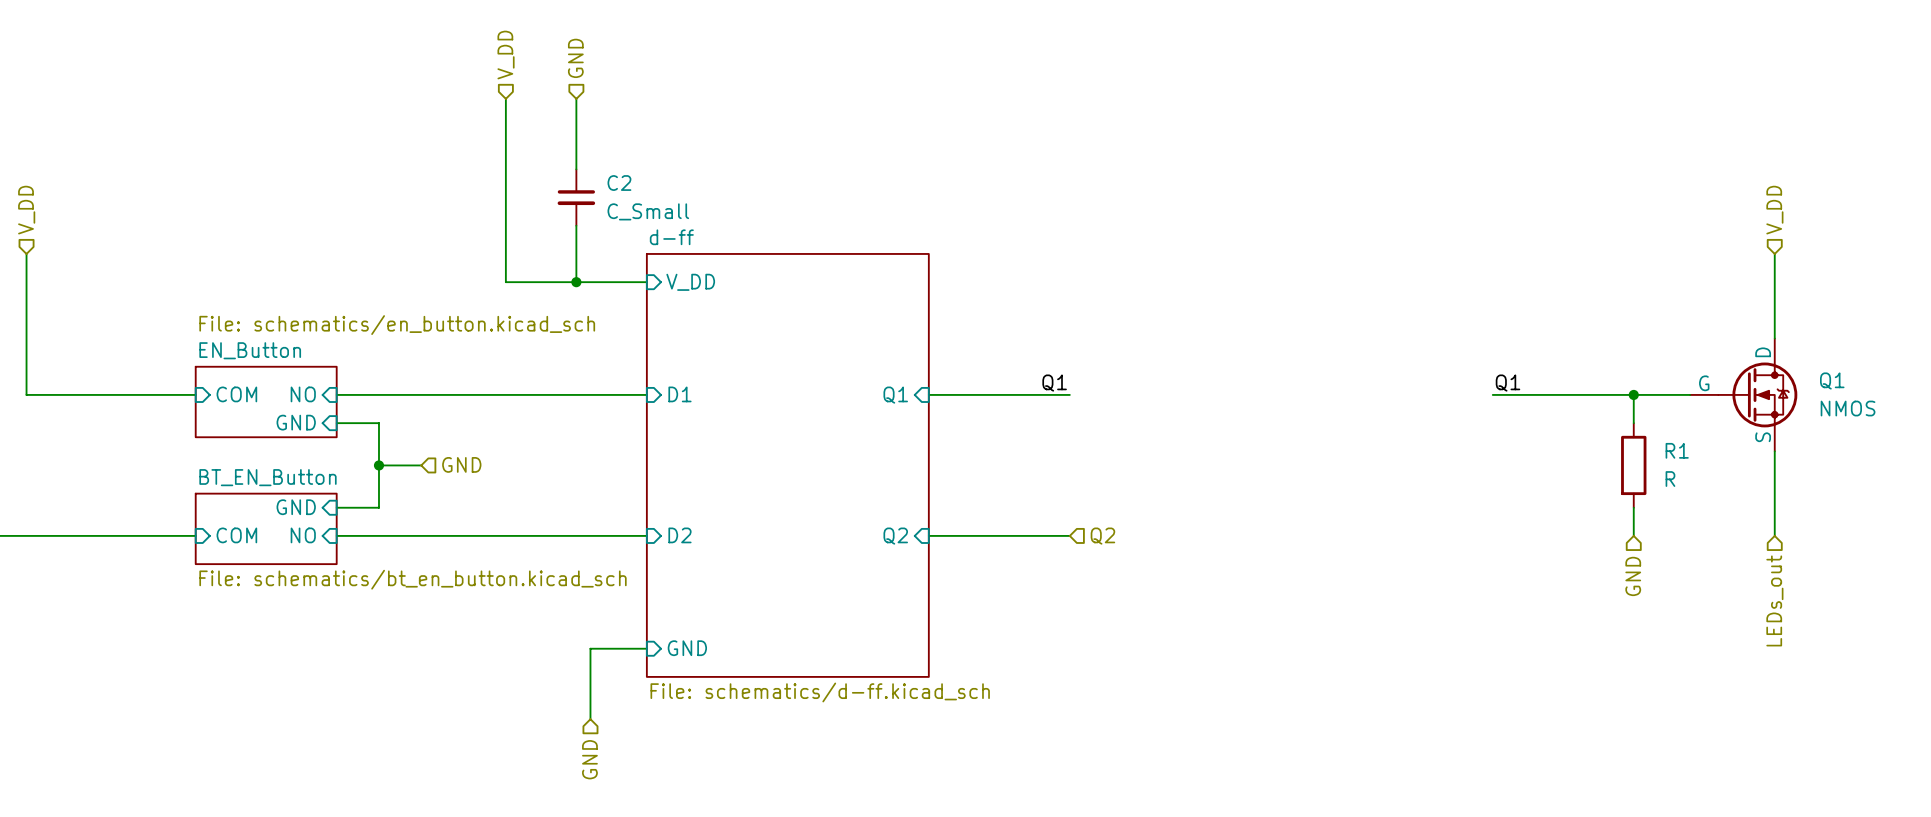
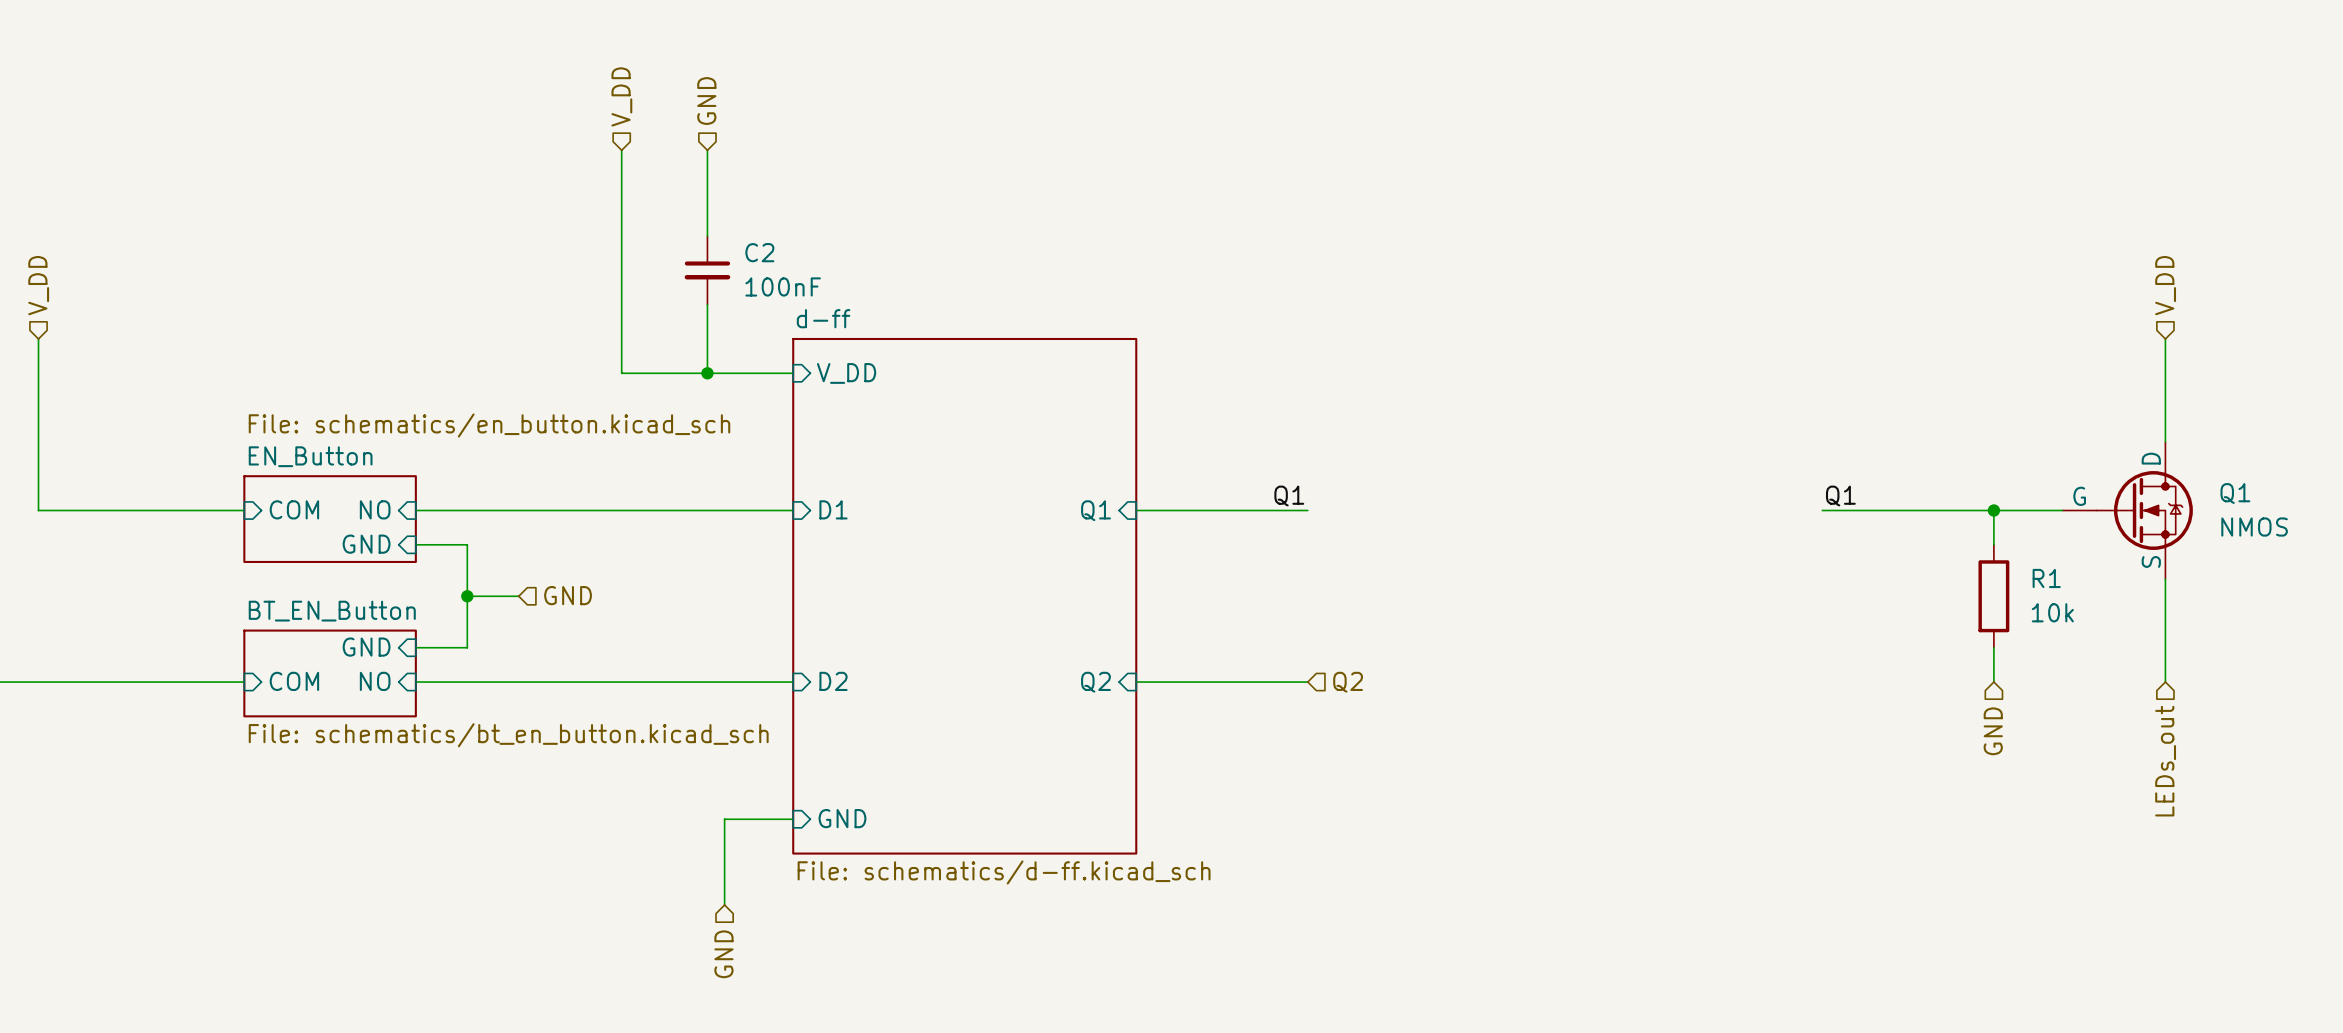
C2 value: C_Small (648, 211) -> 100nF (783, 286)
R1 value: R (1670, 479) -> 10k (2052, 612)

